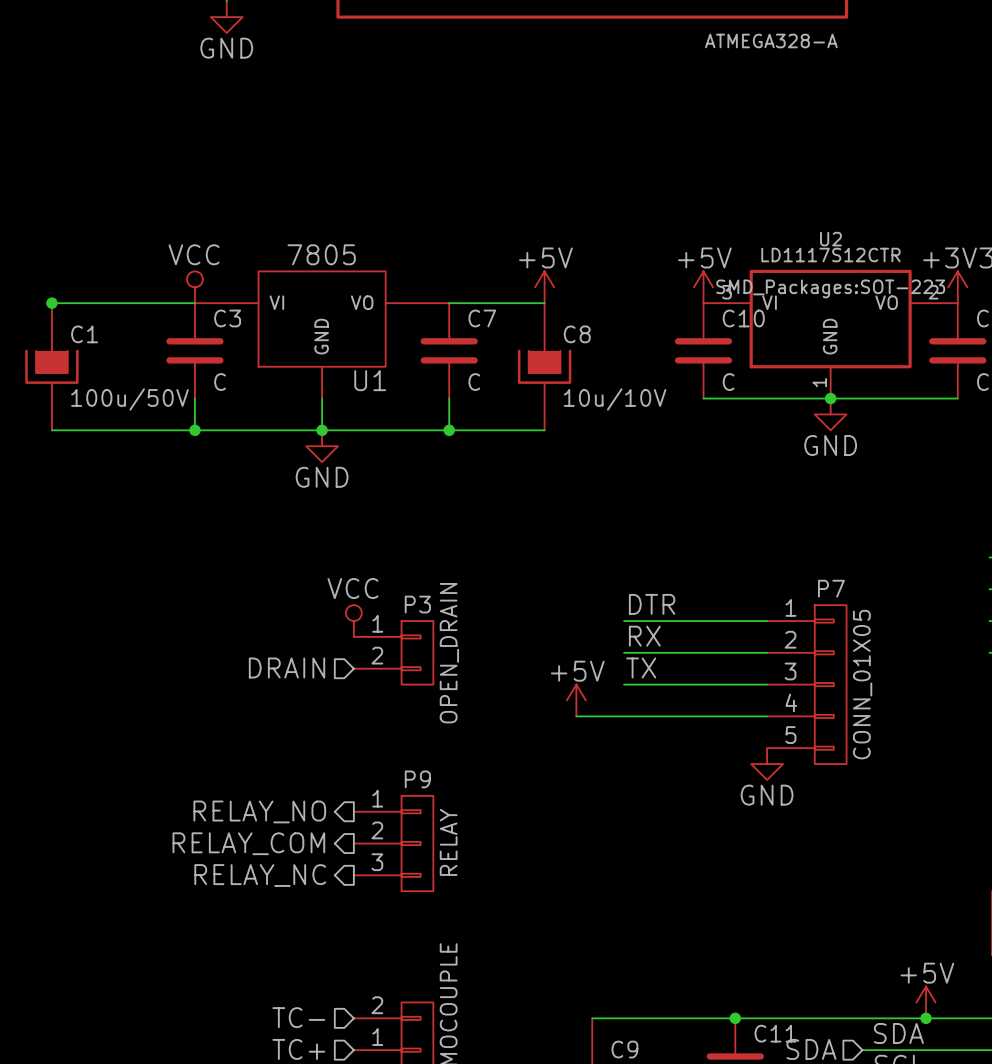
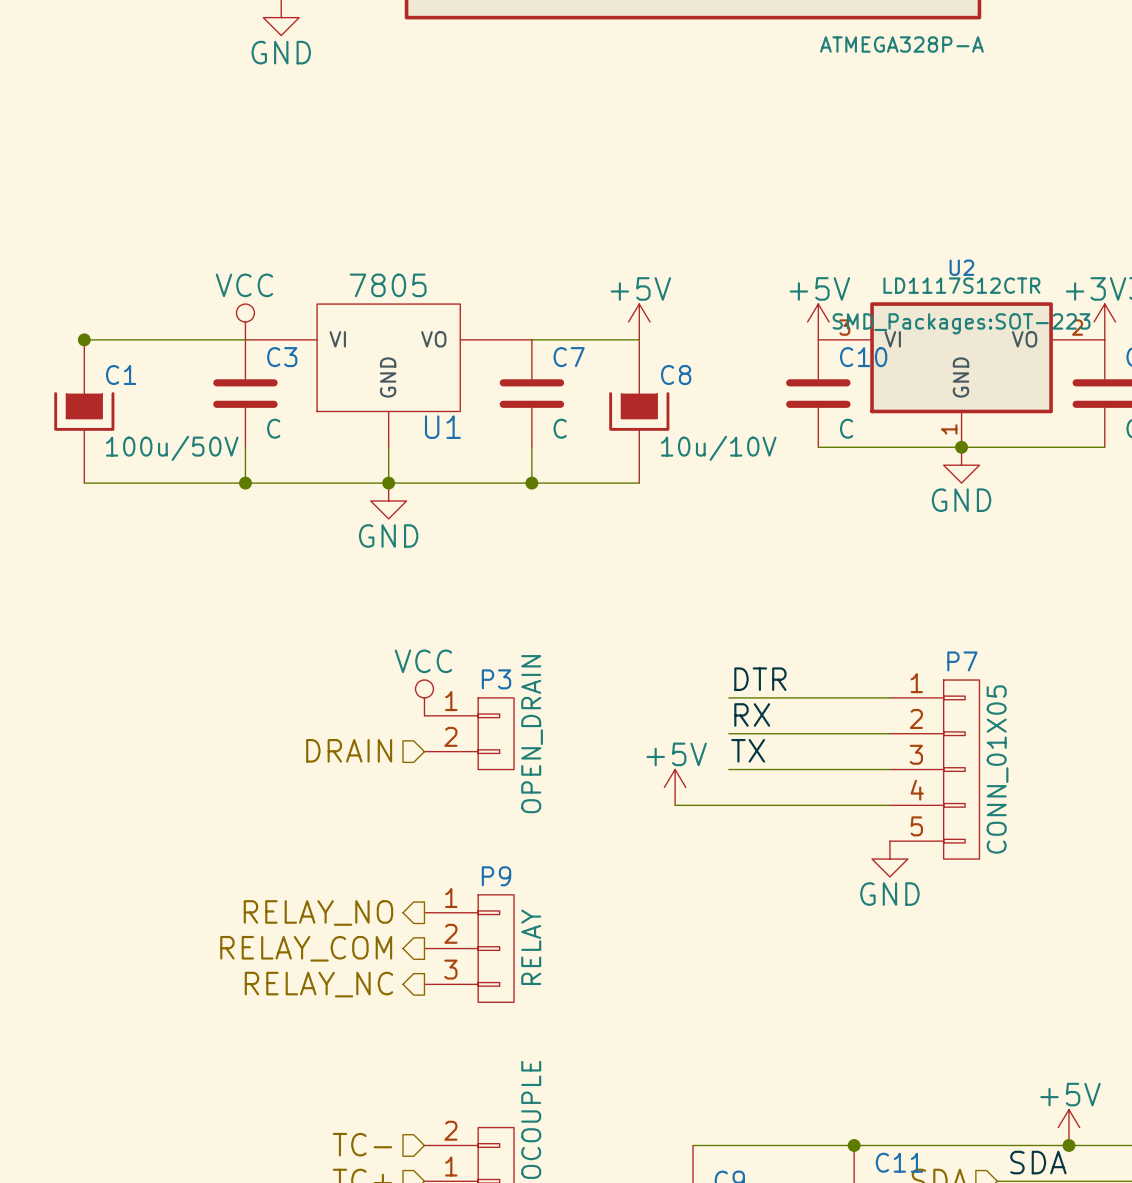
part value: ATMEGA328-A (771, 40) -> ATMEGA328P-A (901, 44)

